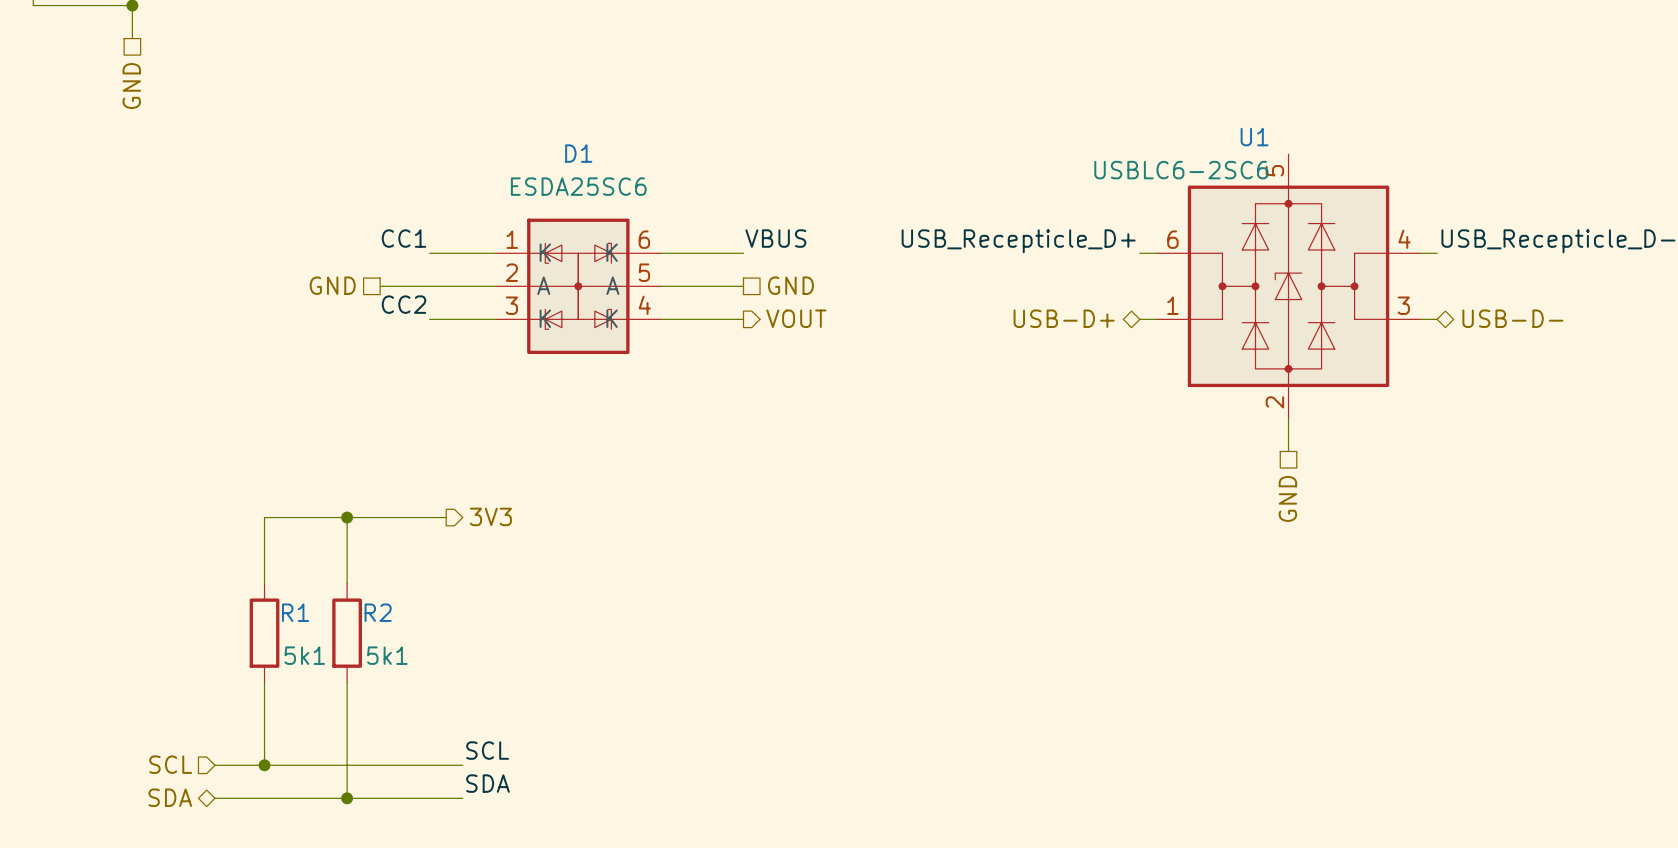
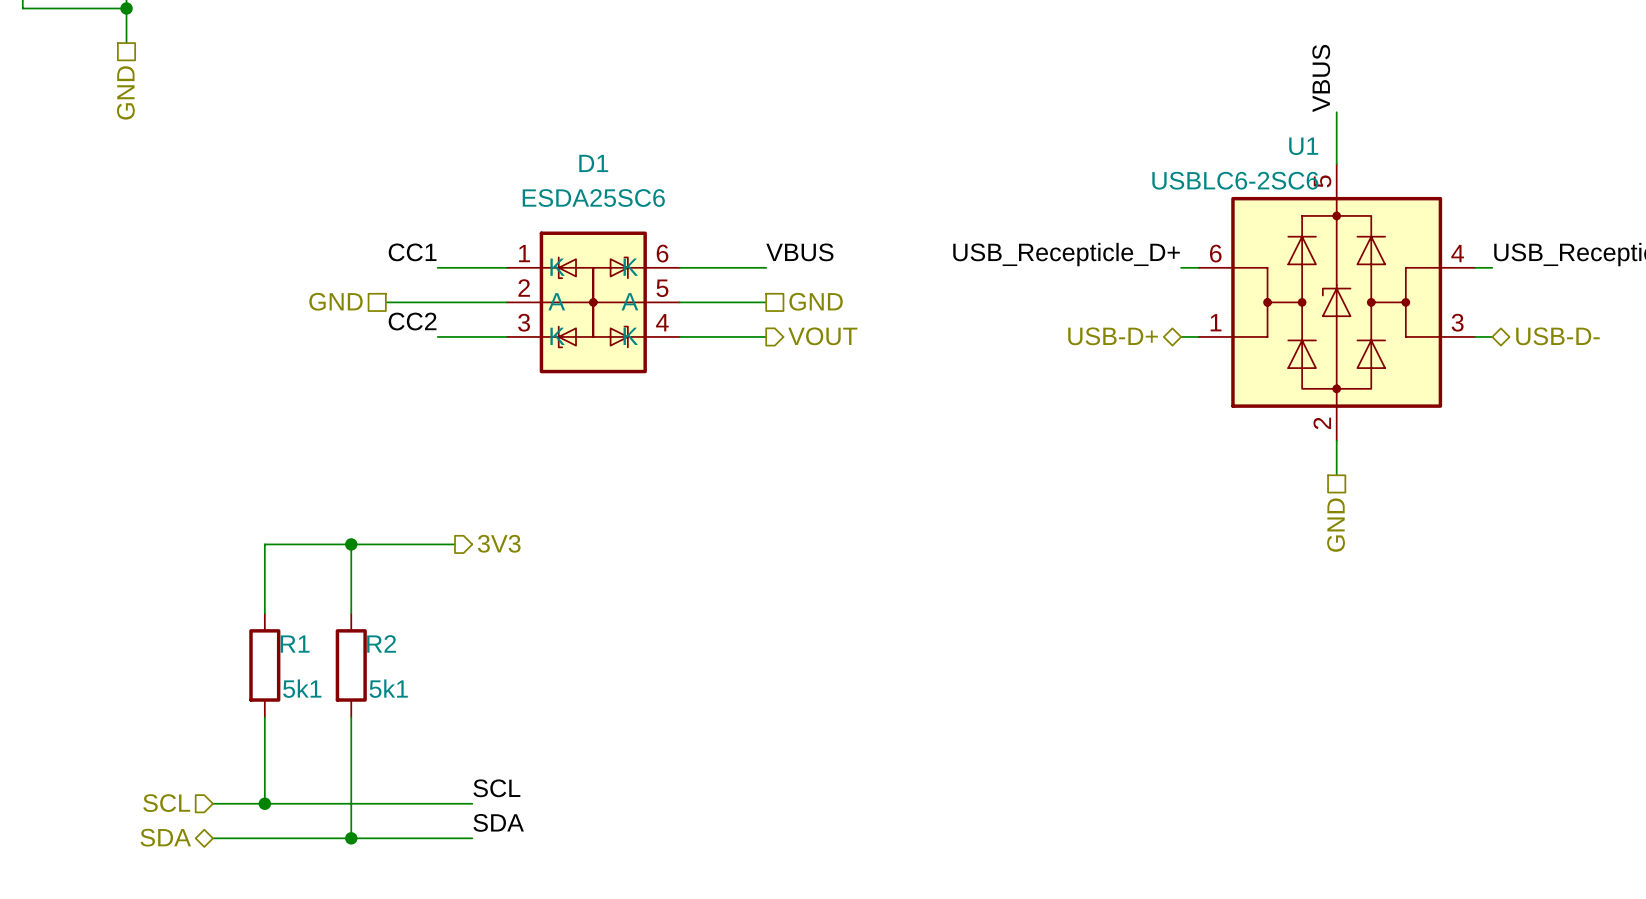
label: none -> VBUS (1321, 78)
wire: none -> (1336, 112) (1336, 164)

